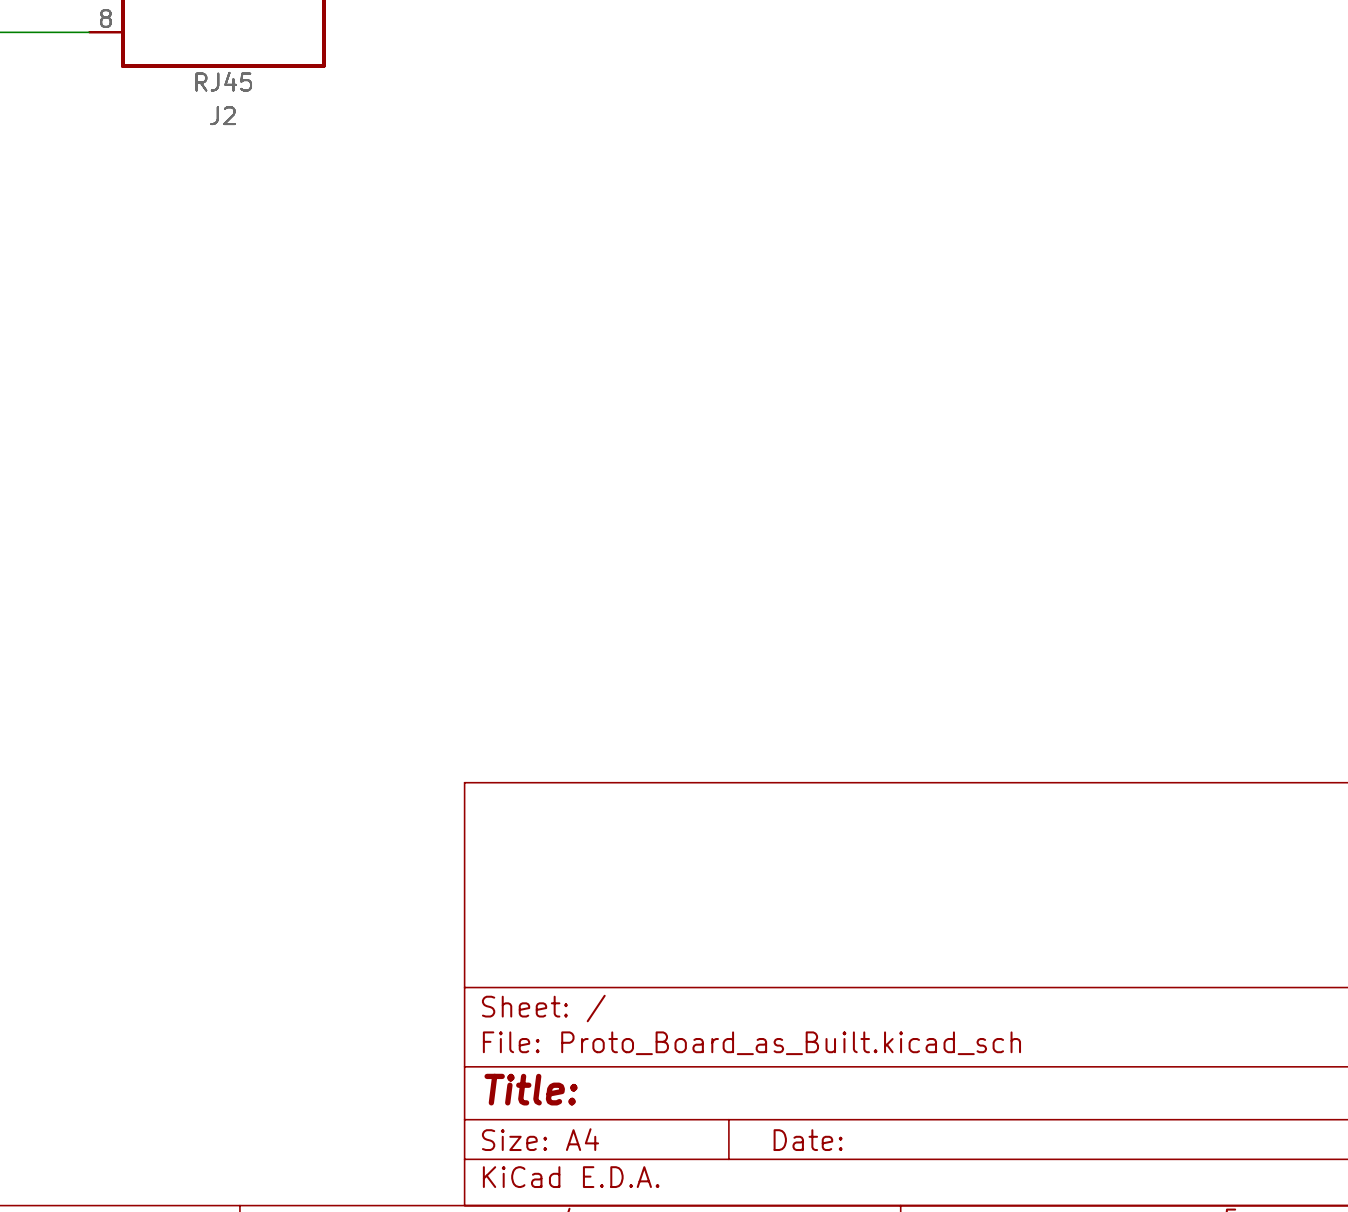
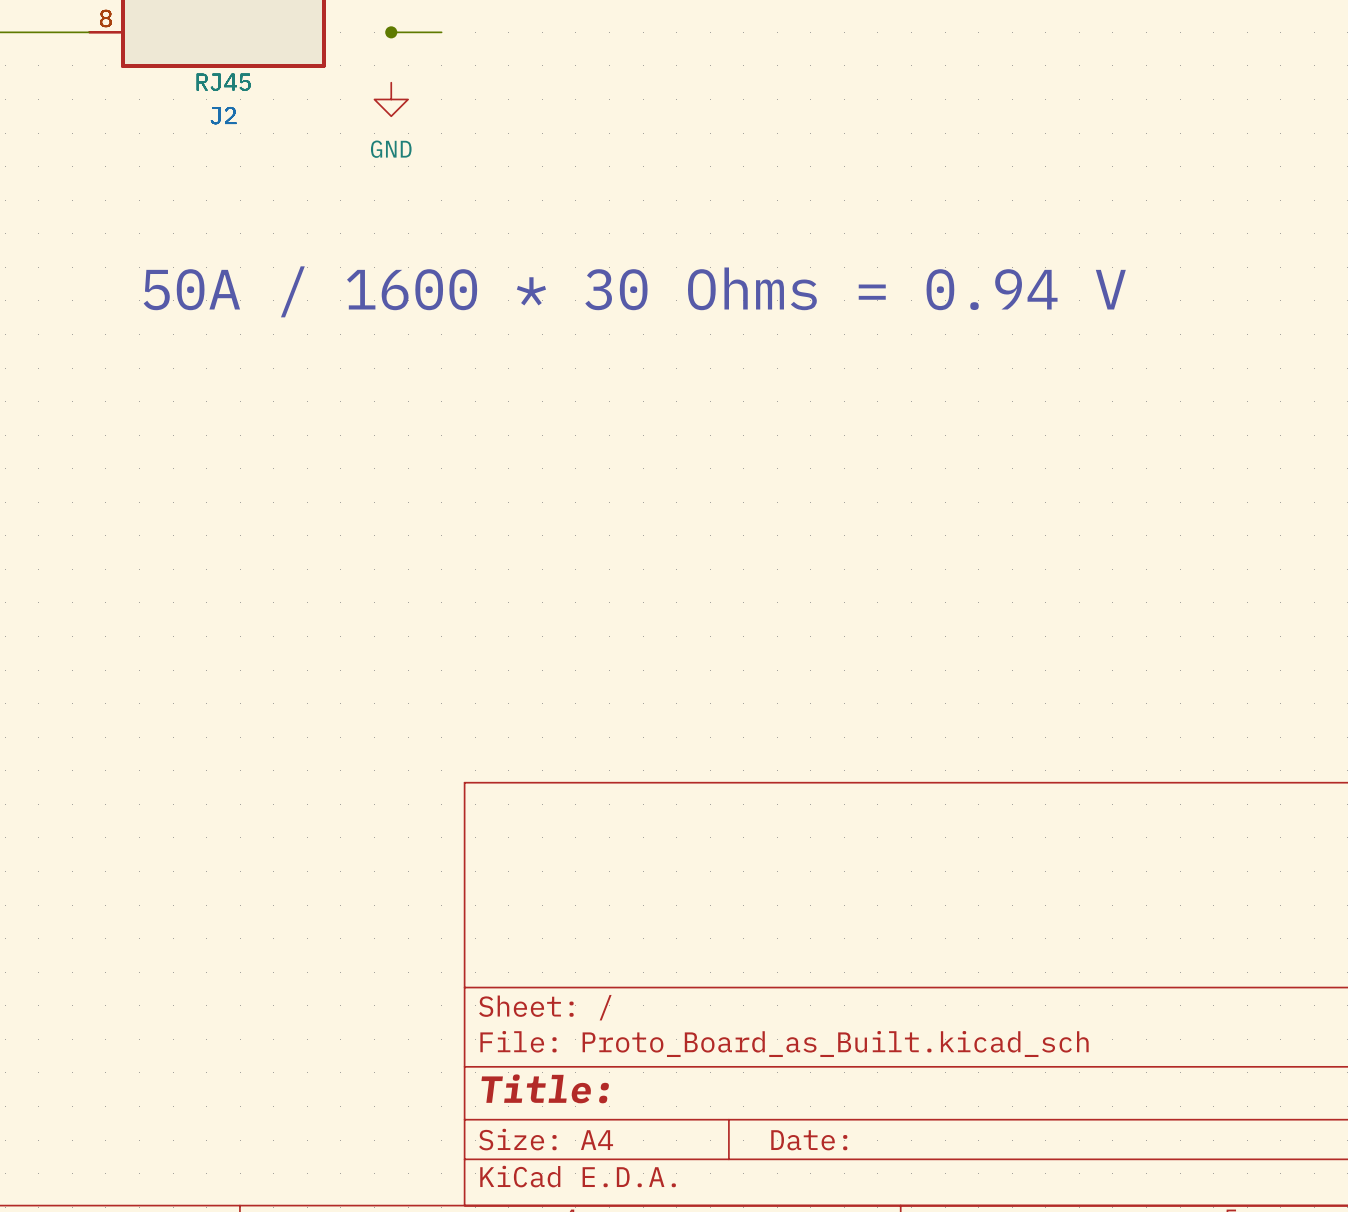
wire: none -> (391, 32) (441, 32)
junction: none -> (391, 32)
power symbol: none -> GND (391, 99)
text: none -> 50A / 1600 * 30 Ohms = 0.94 V (634, 291)

